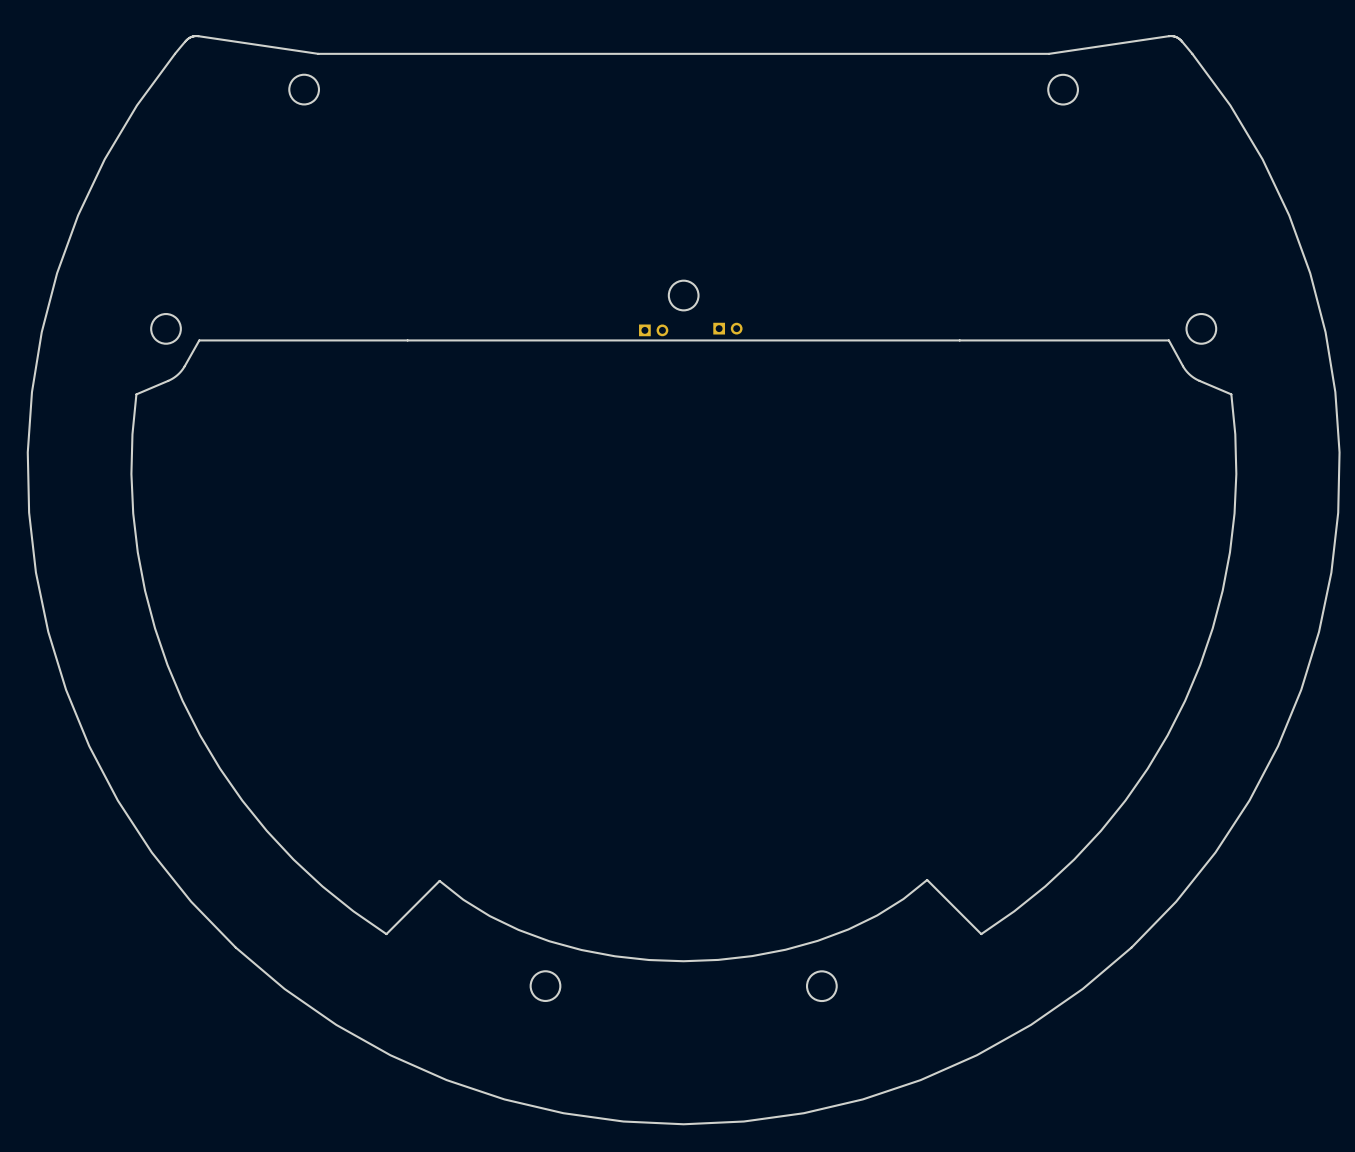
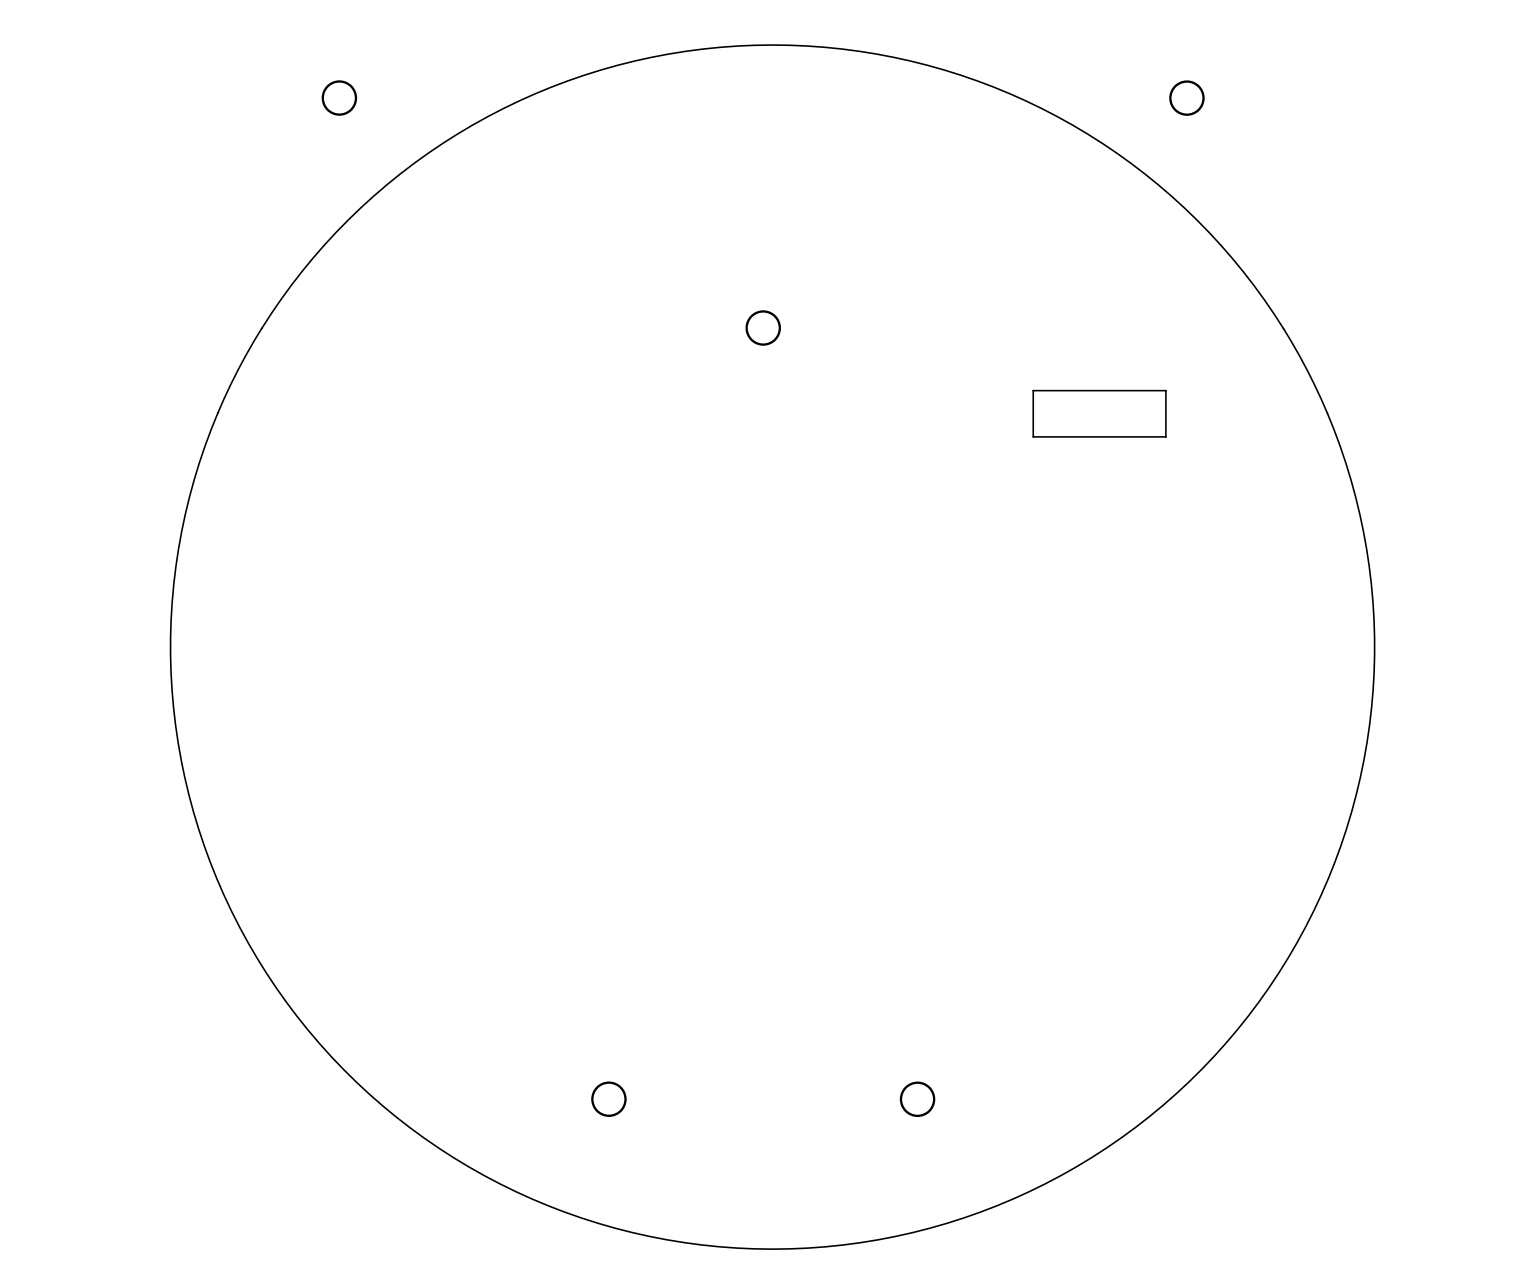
board edge: (1171, 36) (1049, 53) (318, 53) (197, 36) (186, 39) (137, 105) (104, 159) (78, 215) (57, 273) (41, 332) (31, 392) (27, 452) (29, 512) (35, 572) (48, 631) (66, 689) (89, 746) (117, 800) (151, 852) (191, 901) (235, 947) (284, 988) (336, 1024) (390, 1055) (446, 1080) (504, 1099) (563, 1113) (623, 1121) (683, 1124) (743, 1121) (803, 1113) (862, 1099) (920, 1080) (976, 1055) (1031, 1024) (1082, 988) (1131, 947) (1176, 901) (1215, 852) (1249, 800) (1278, 746) (1301, 689) (1319, 631) (1331, 572) (1338, 512) (1339, 452) (1335, 392) (1325, 332) (1310, 273) (1289, 215) (1262, 159) (1230, 105) (1187, 47) (1179, 39) (1171, 36) -> none
round board edge: [150, 313, 182, 345] -> none
round board edge: [1185, 313, 1218, 345] -> none
part: (727, 328) -> none
part: (653, 330) -> none
board edge: (1168, 340) (1190, 374) (1231, 394) (1235, 434) (1234, 513) (1229, 552) (1212, 628) (1200, 665) (1167, 735) (1125, 800) (1074, 859) (1045, 886) (981, 934) (927, 880) (903, 899) (877, 915) (848, 929) (785, 949) (718, 959) (649, 960) (614, 956) (549, 941) (518, 929) (489, 916) (463, 899) (439, 880) (386, 934) (322, 886) (293, 859) (242, 800) (220, 768) (182, 700) (155, 628) (145, 590) (133, 513) (131, 474) (136, 394) (177, 374) (199, 340) (1168, 340) -> (261, 328) (301, 271) (336, 232) (387, 184) (428, 152) (472, 124) (535, 93) (584, 75) (634, 61) (703, 49) (755, 45) (824, 47) (876, 54) (927, 65) (993, 87) (1041, 108) (1087, 133) (1144, 173) (1184, 207) (1232, 258) (1264, 299) (1291, 342) (1321, 398) (1345, 463) (1359, 514) (1369, 566) (1374, 637) (1373, 690) (1363, 760) (1351, 811) (1328, 878) (1305, 926) (1279, 972) (1237, 1029) (1201, 1069) (1149, 1116) (1106, 1148) (1061, 1175) (1013, 1198) (963, 1217) (895, 1236) (843, 1244) (772, 1249) (719, 1246) (666, 1239) (615, 1228) (548, 1205) (499, 1183) (453, 1157) (409, 1127) (355, 1081) (319, 1043) (275, 987) (247, 942) (216, 878) (198, 828) (184, 777) (175, 725) (171, 672) (171, 619) (178, 549) (189, 497) (211, 429) (230, 384) (261, 328)
board edge: none -> (1165, 390) (1033, 390) (1033, 436) (1165, 436) (1165, 390)

